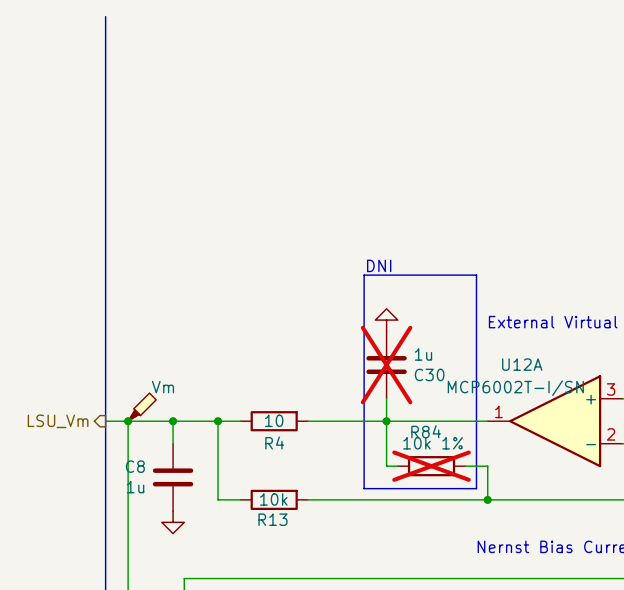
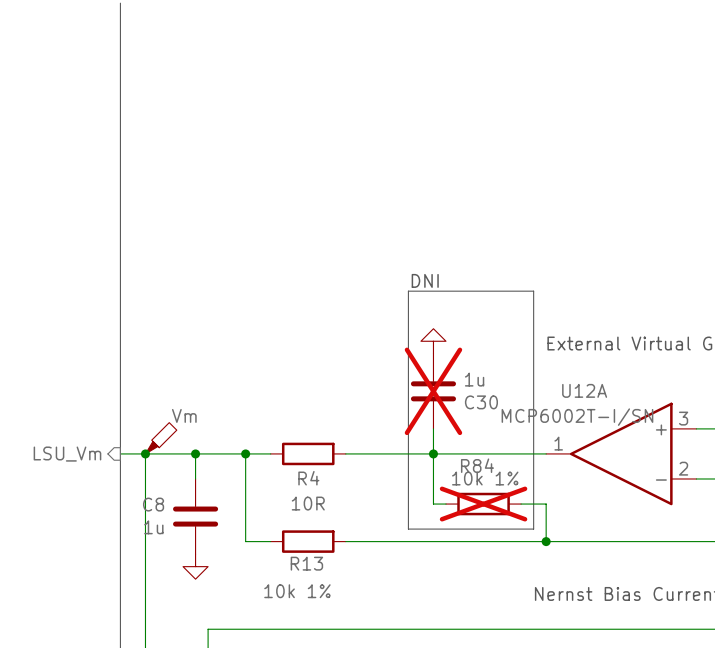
R4 value: 10 (274, 420) -> 10R (308, 503)
R13 value: 10k (273, 499) -> 10k 1% (297, 591)

